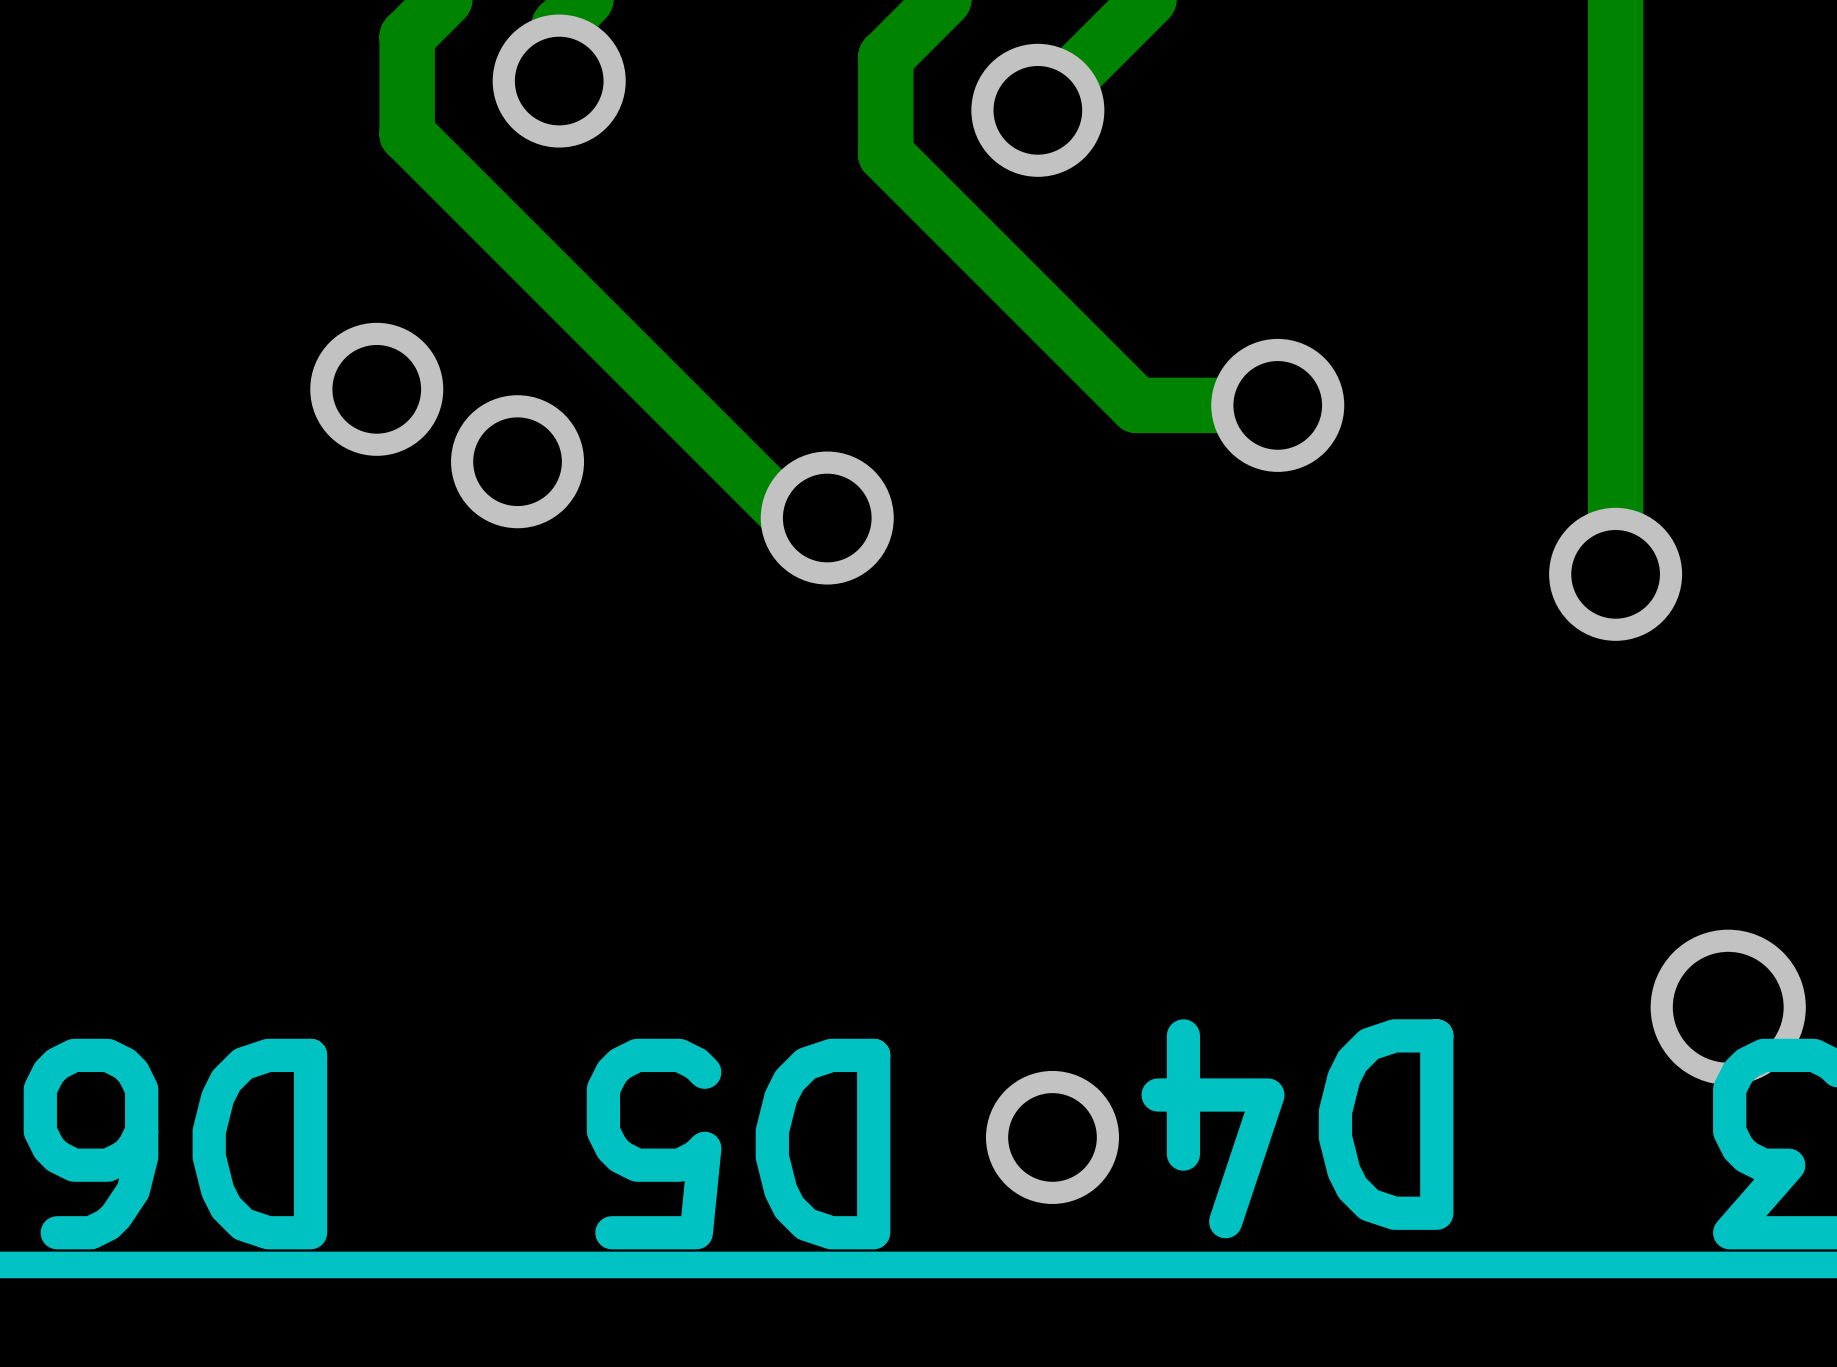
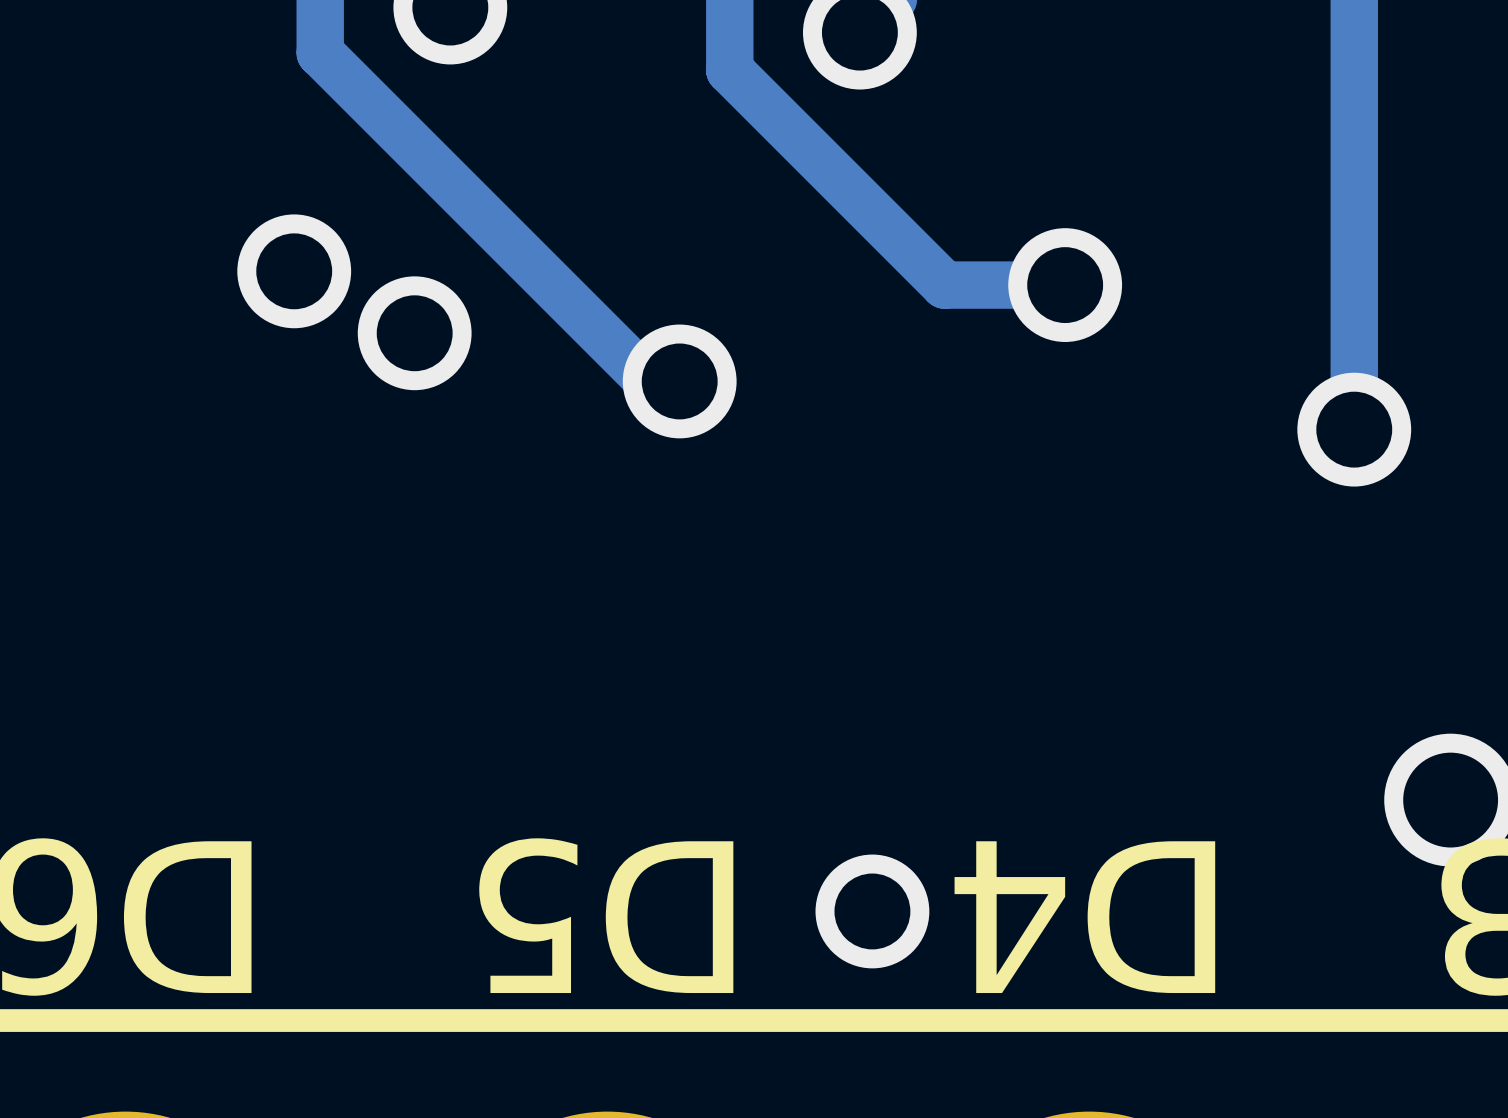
text position: D4 (1297, 1128) -> D4 (1084, 917)

